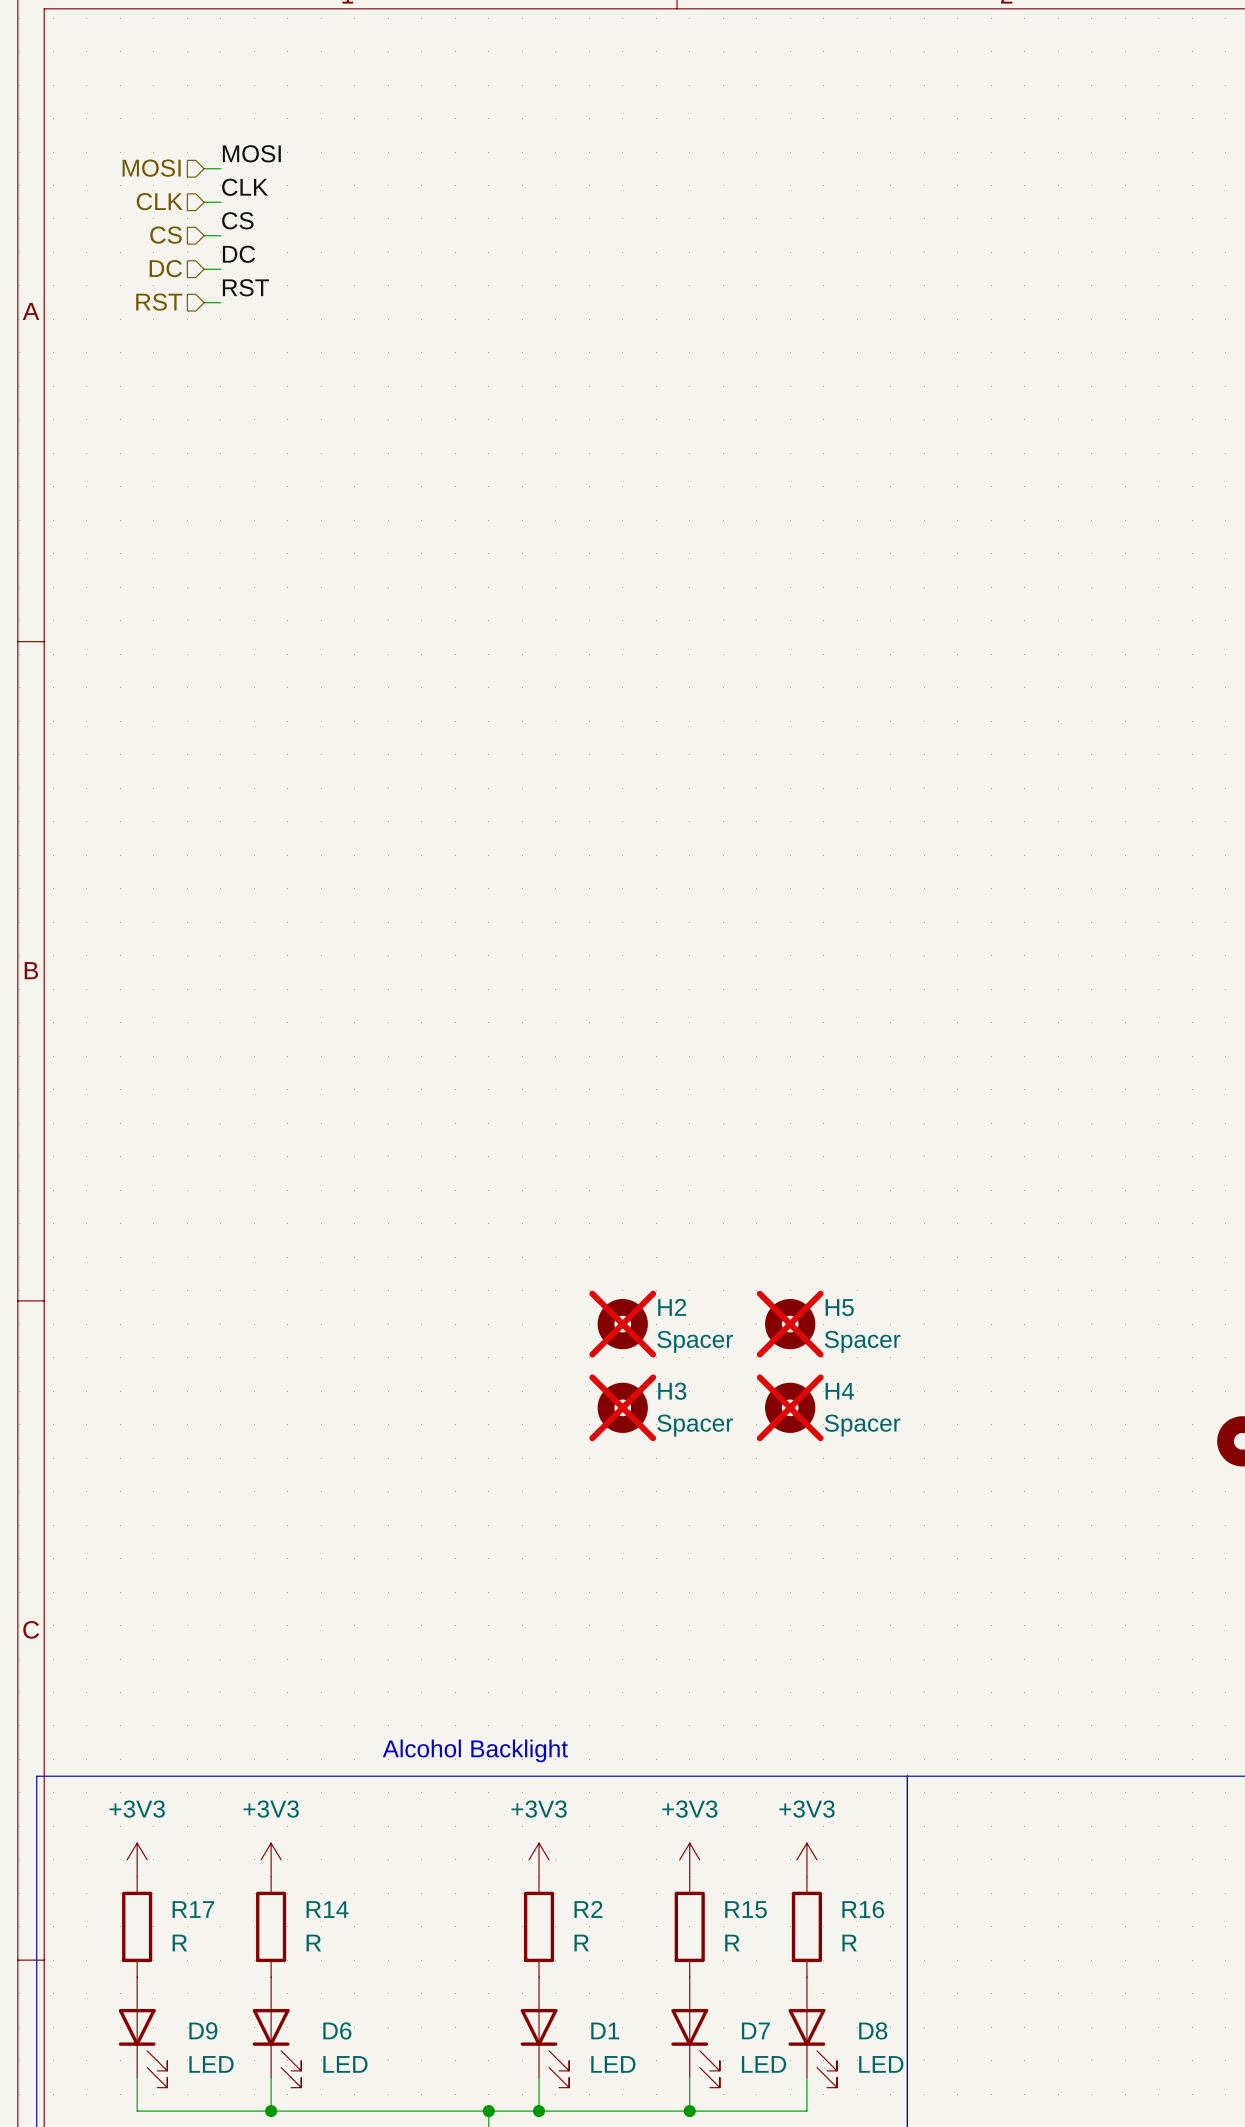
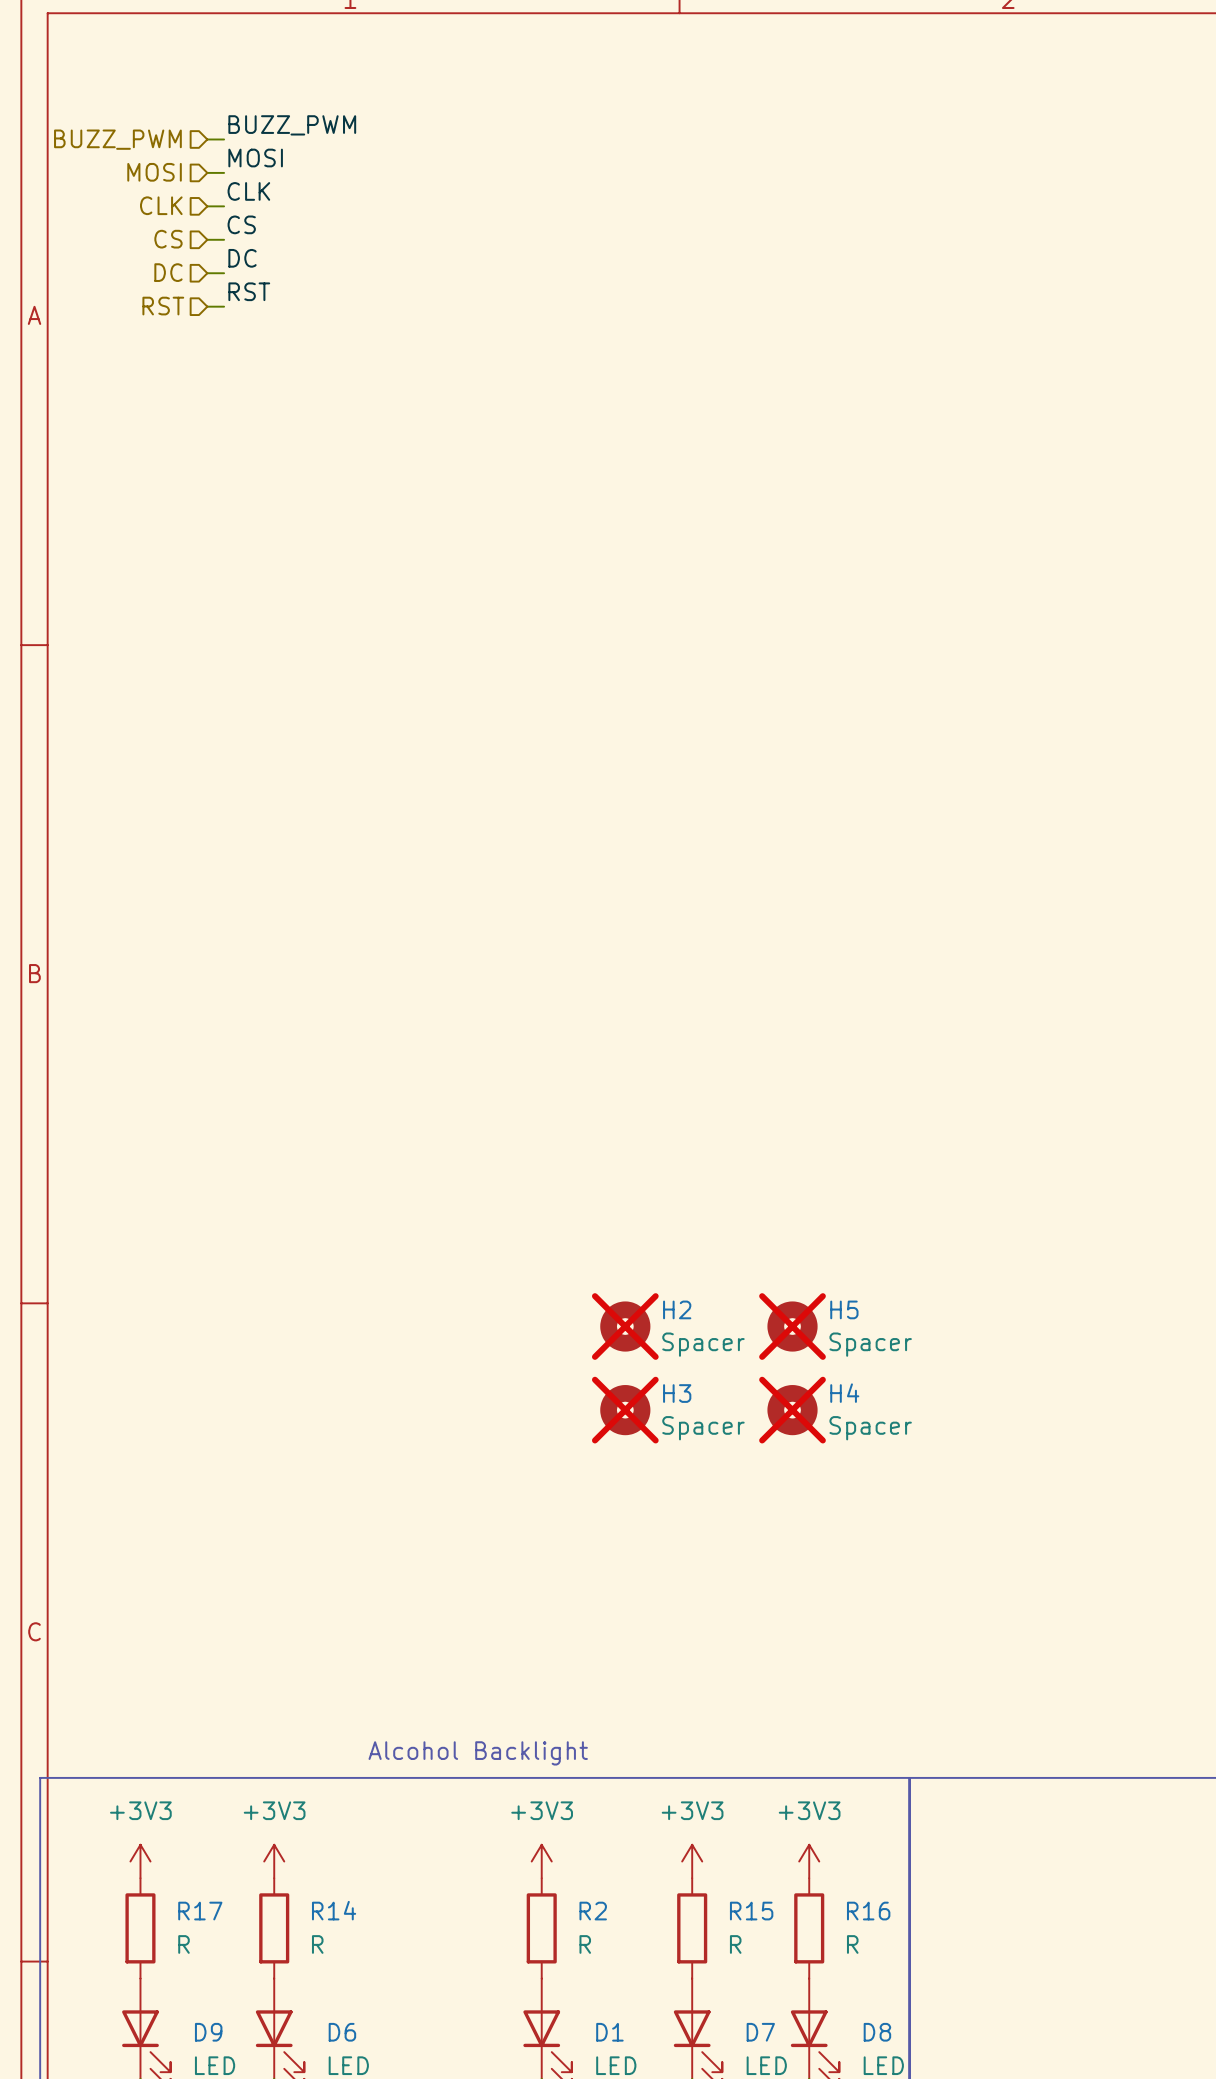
label: none -> BUZZ_PWM (292, 125)
wire: none -> (207, 139) (224, 139)
hierarchical label: none -> BUZZ_PWM (117, 139)

